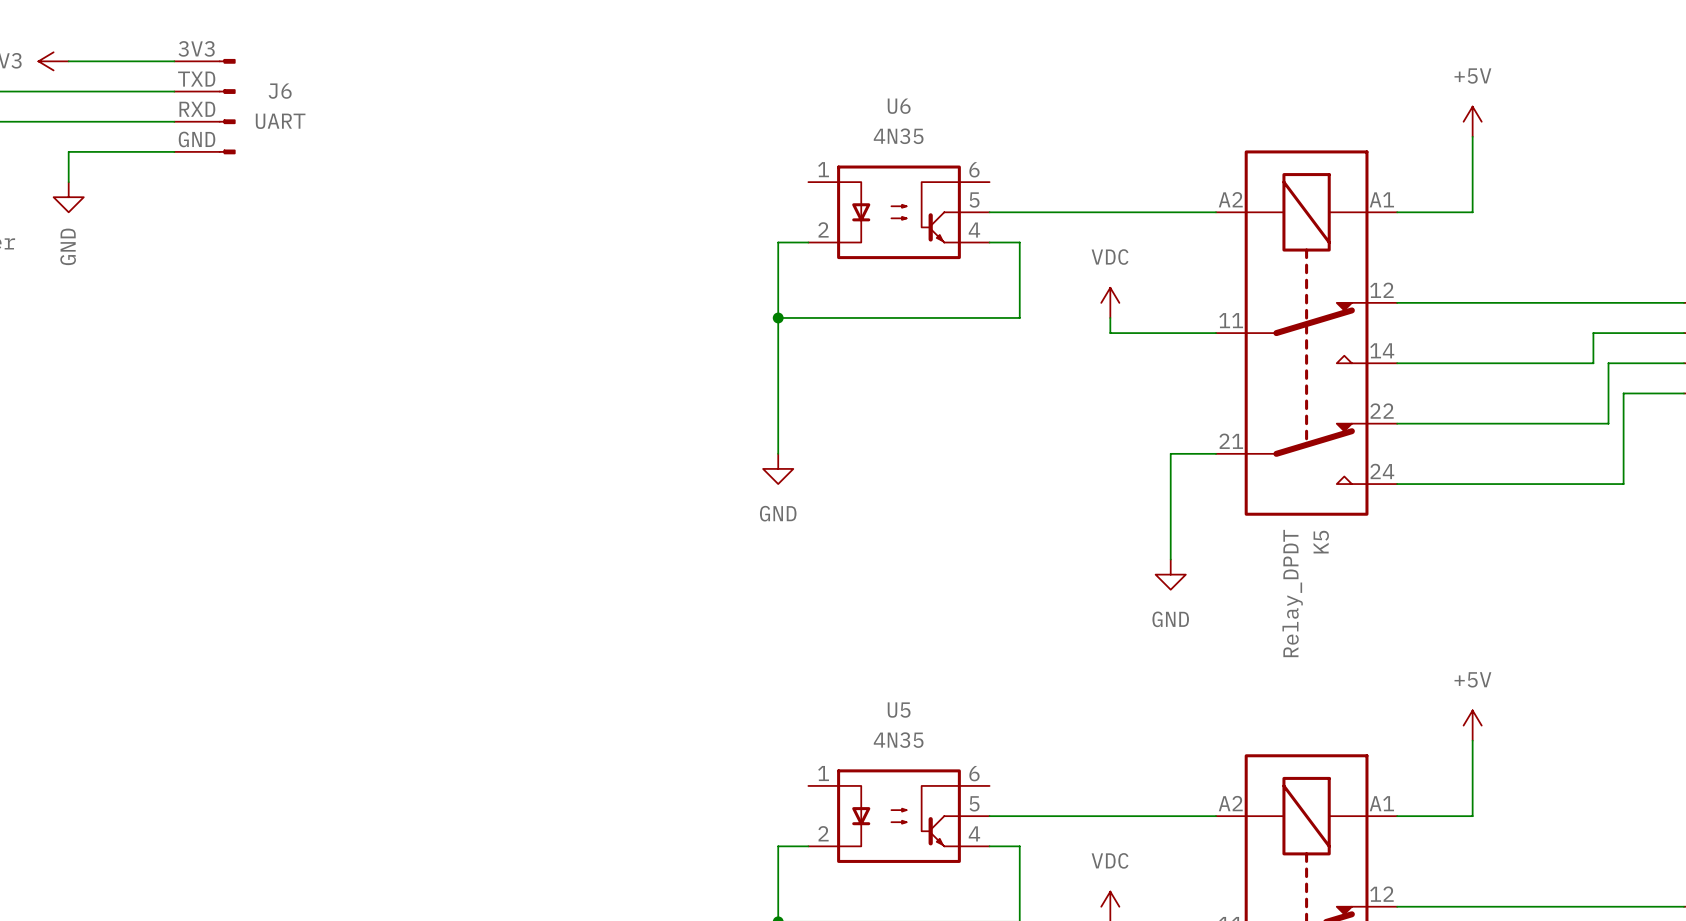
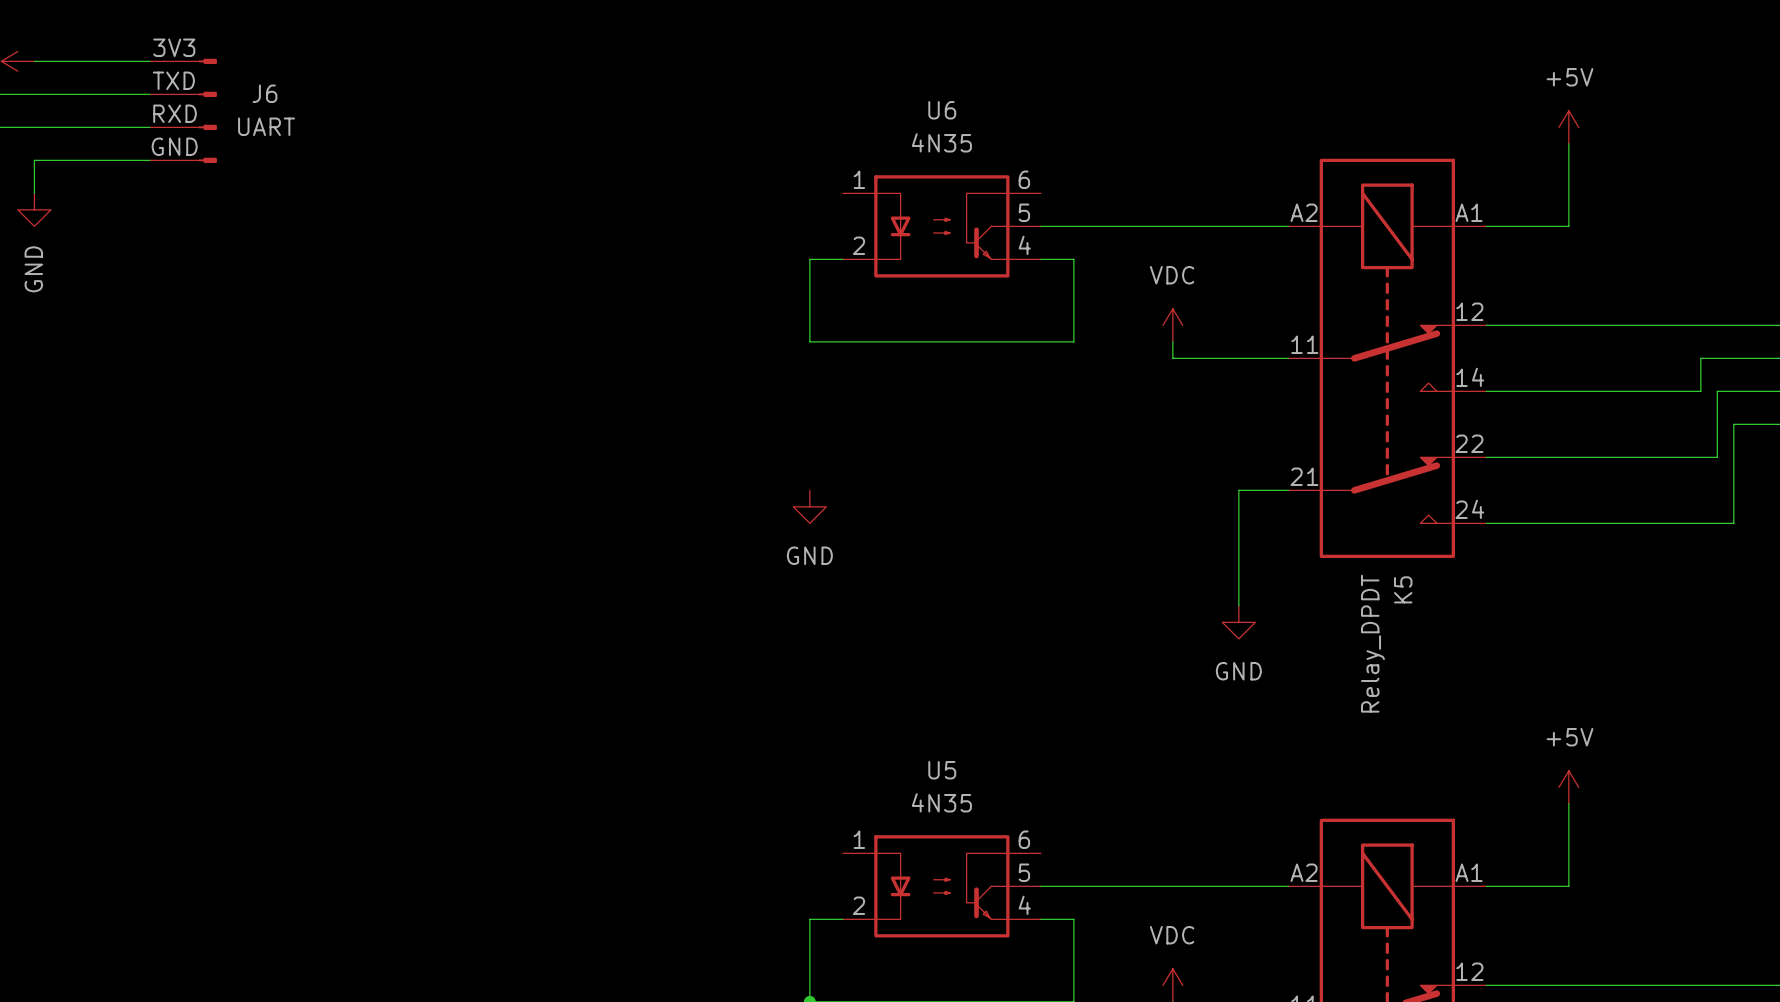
wire: (778, 317) (778, 453) -> none
junction: (778, 317) -> none

